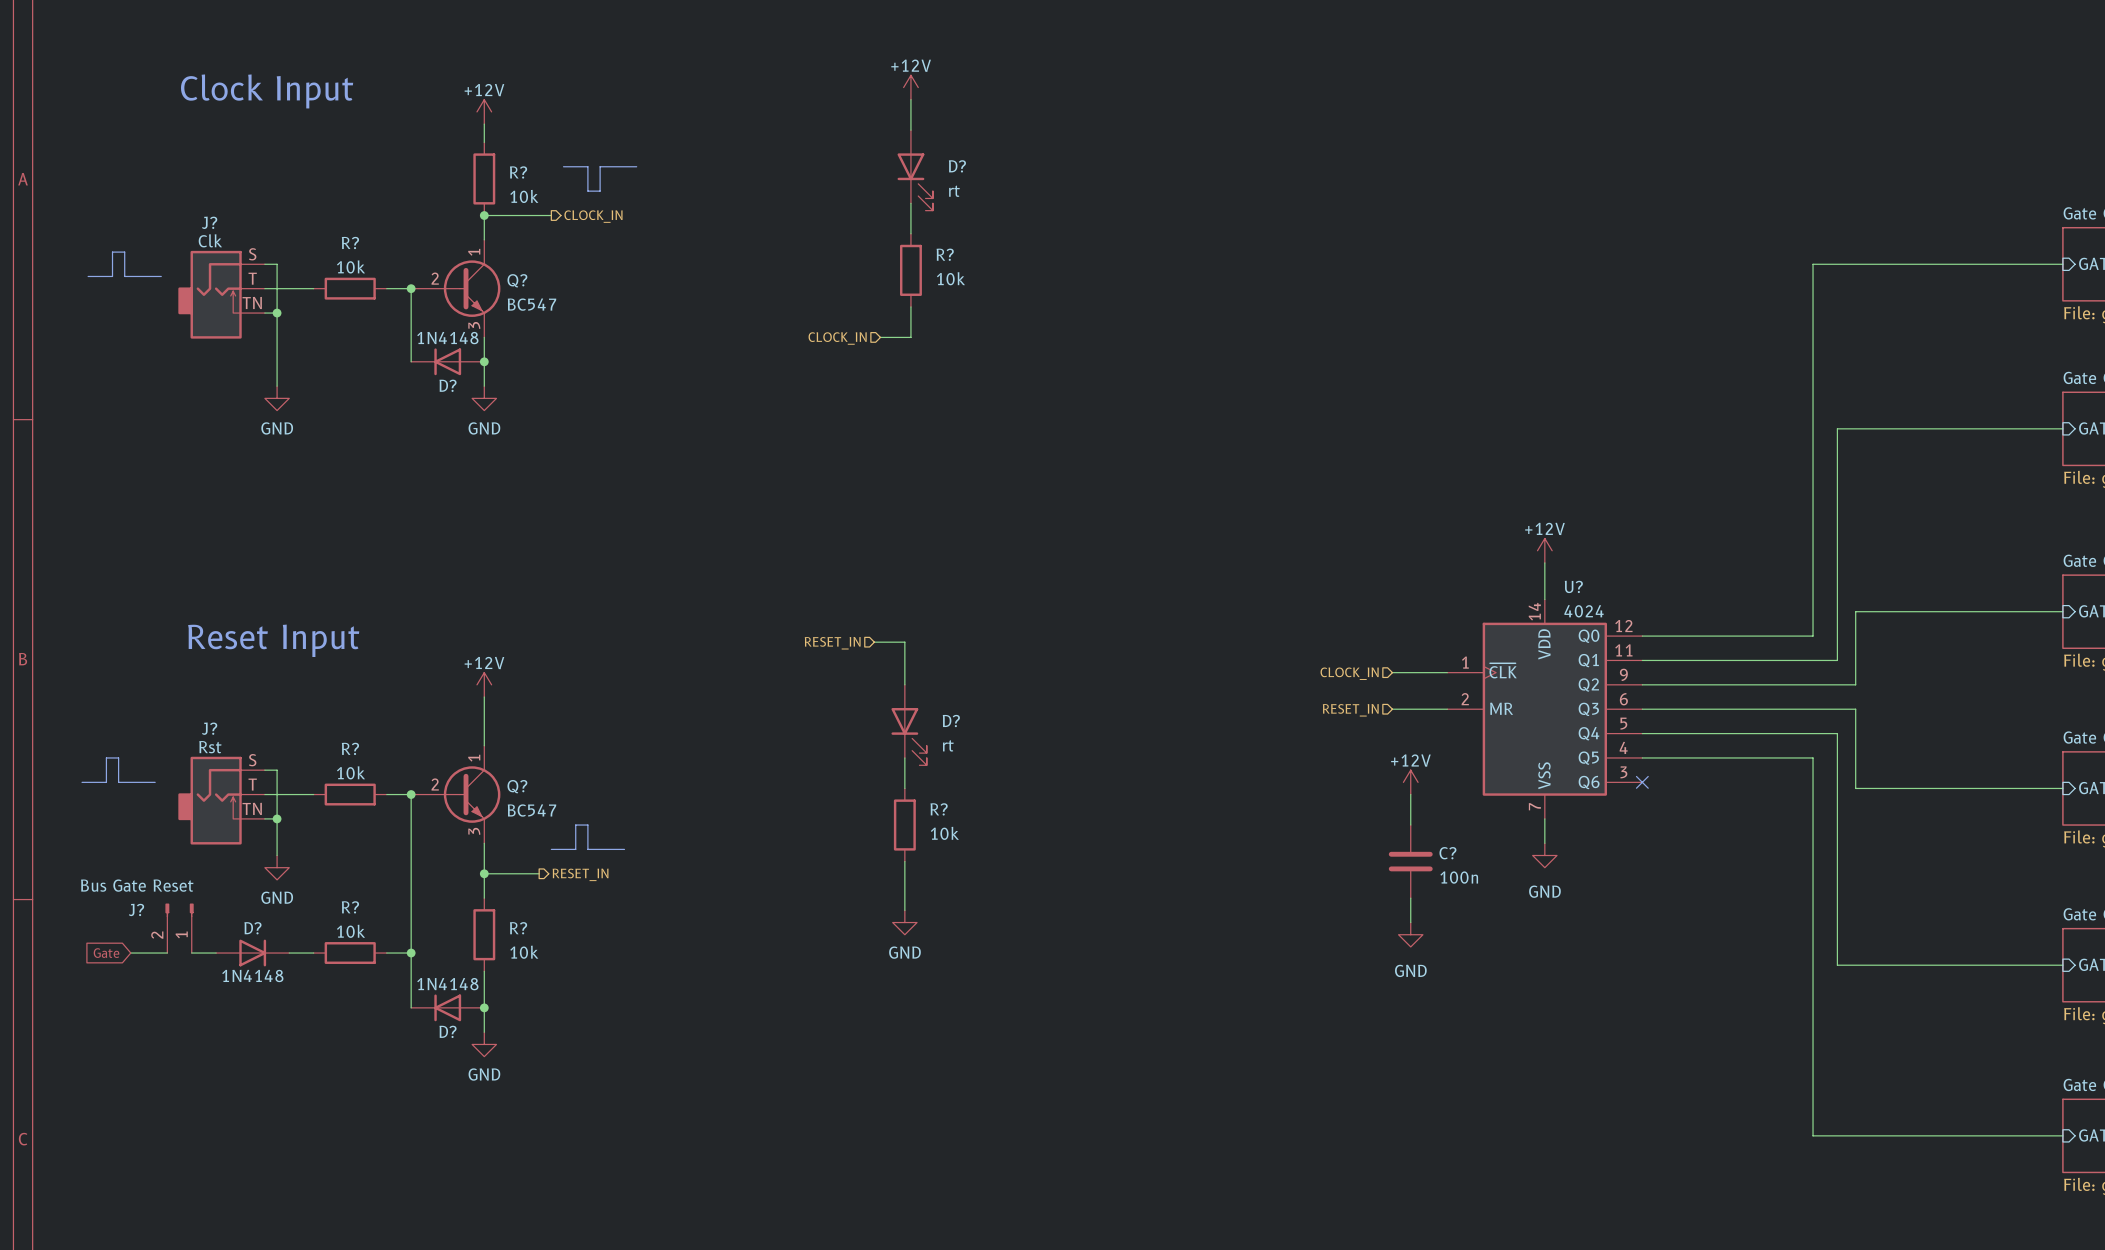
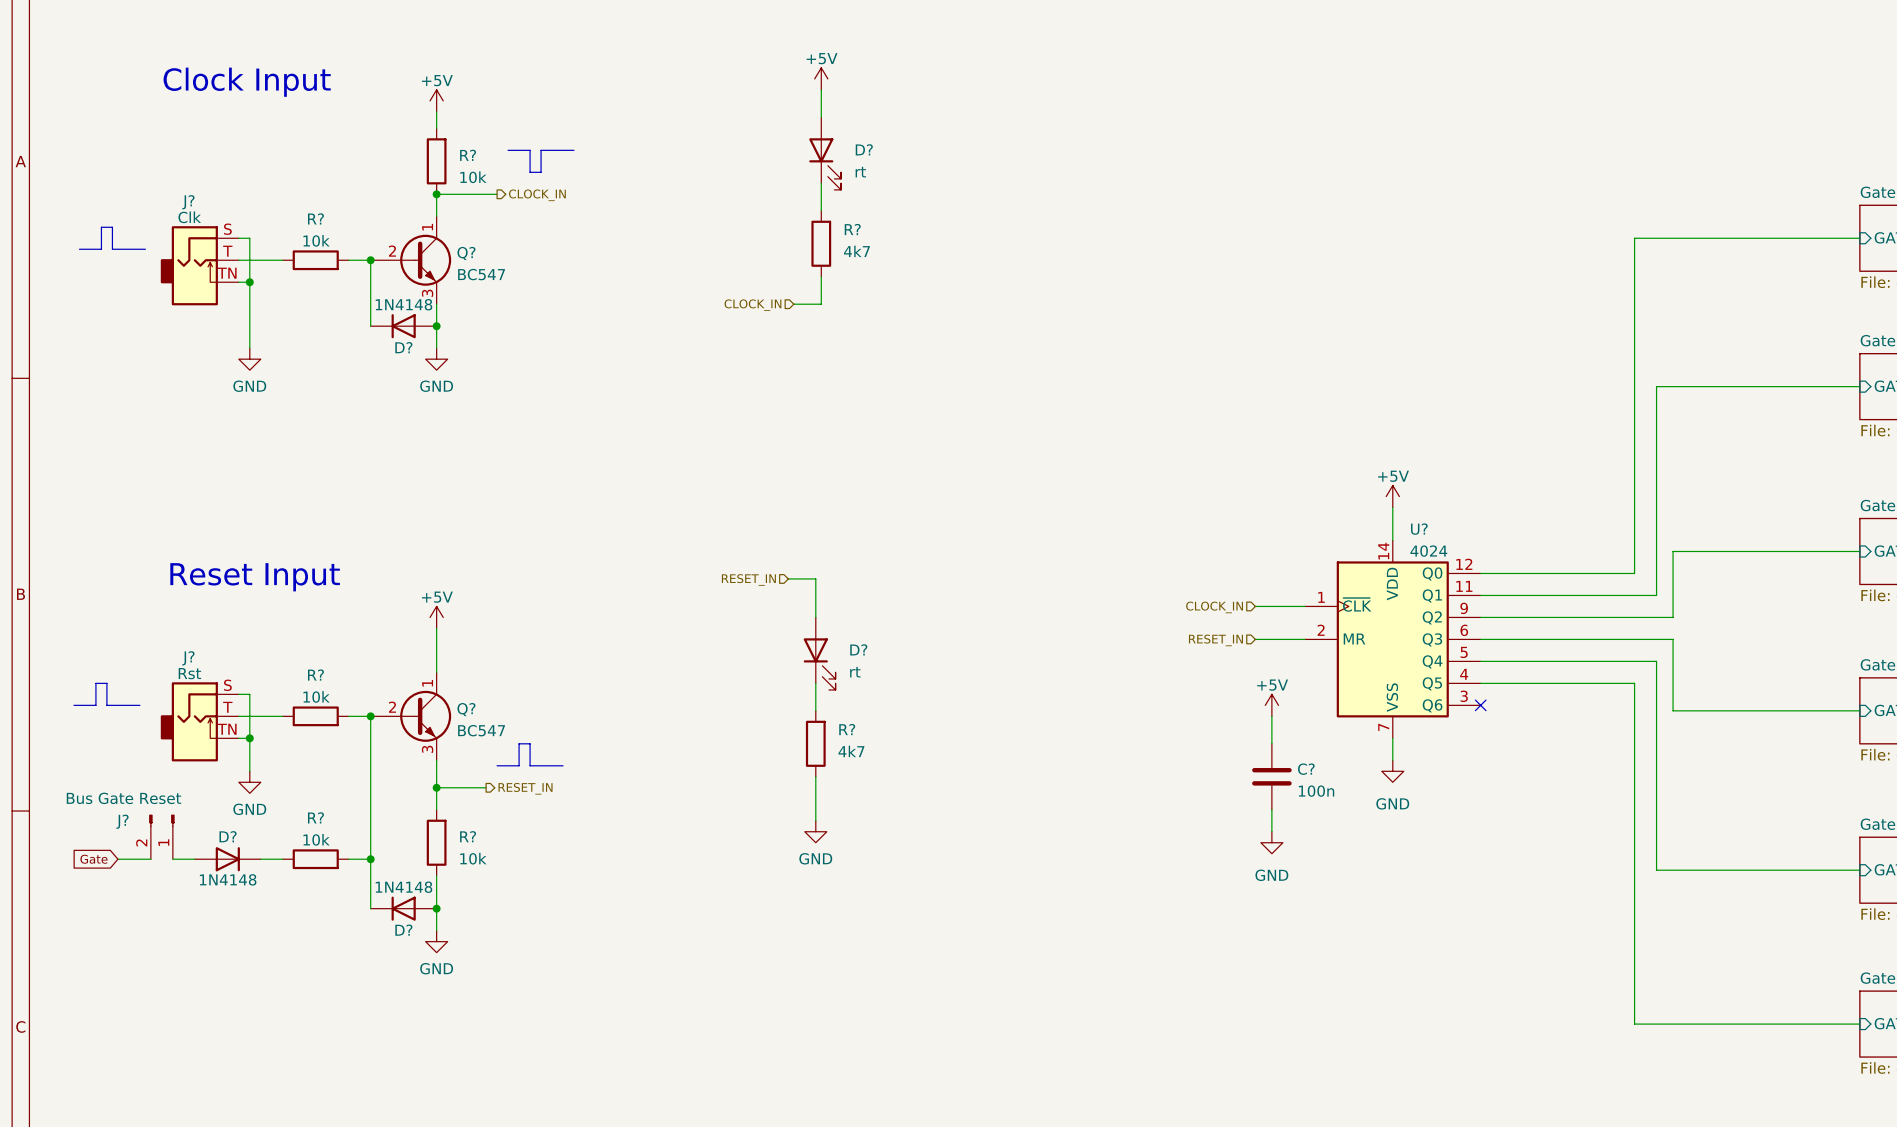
power symbol: +12V (910, 87) -> +5V (821, 78)
power symbol: +12V (484, 111) -> +5V (436, 100)
R? value: 10k (950, 278) -> 4k7 (856, 251)
power symbol: +12V (1544, 550) -> +5V (1392, 496)
power symbol: +12V (484, 684) -> +5V (436, 617)
power symbol: +12V (1410, 782) -> +5V (1271, 705)
R? value: 10k (944, 833) -> 4k7 (851, 751)

